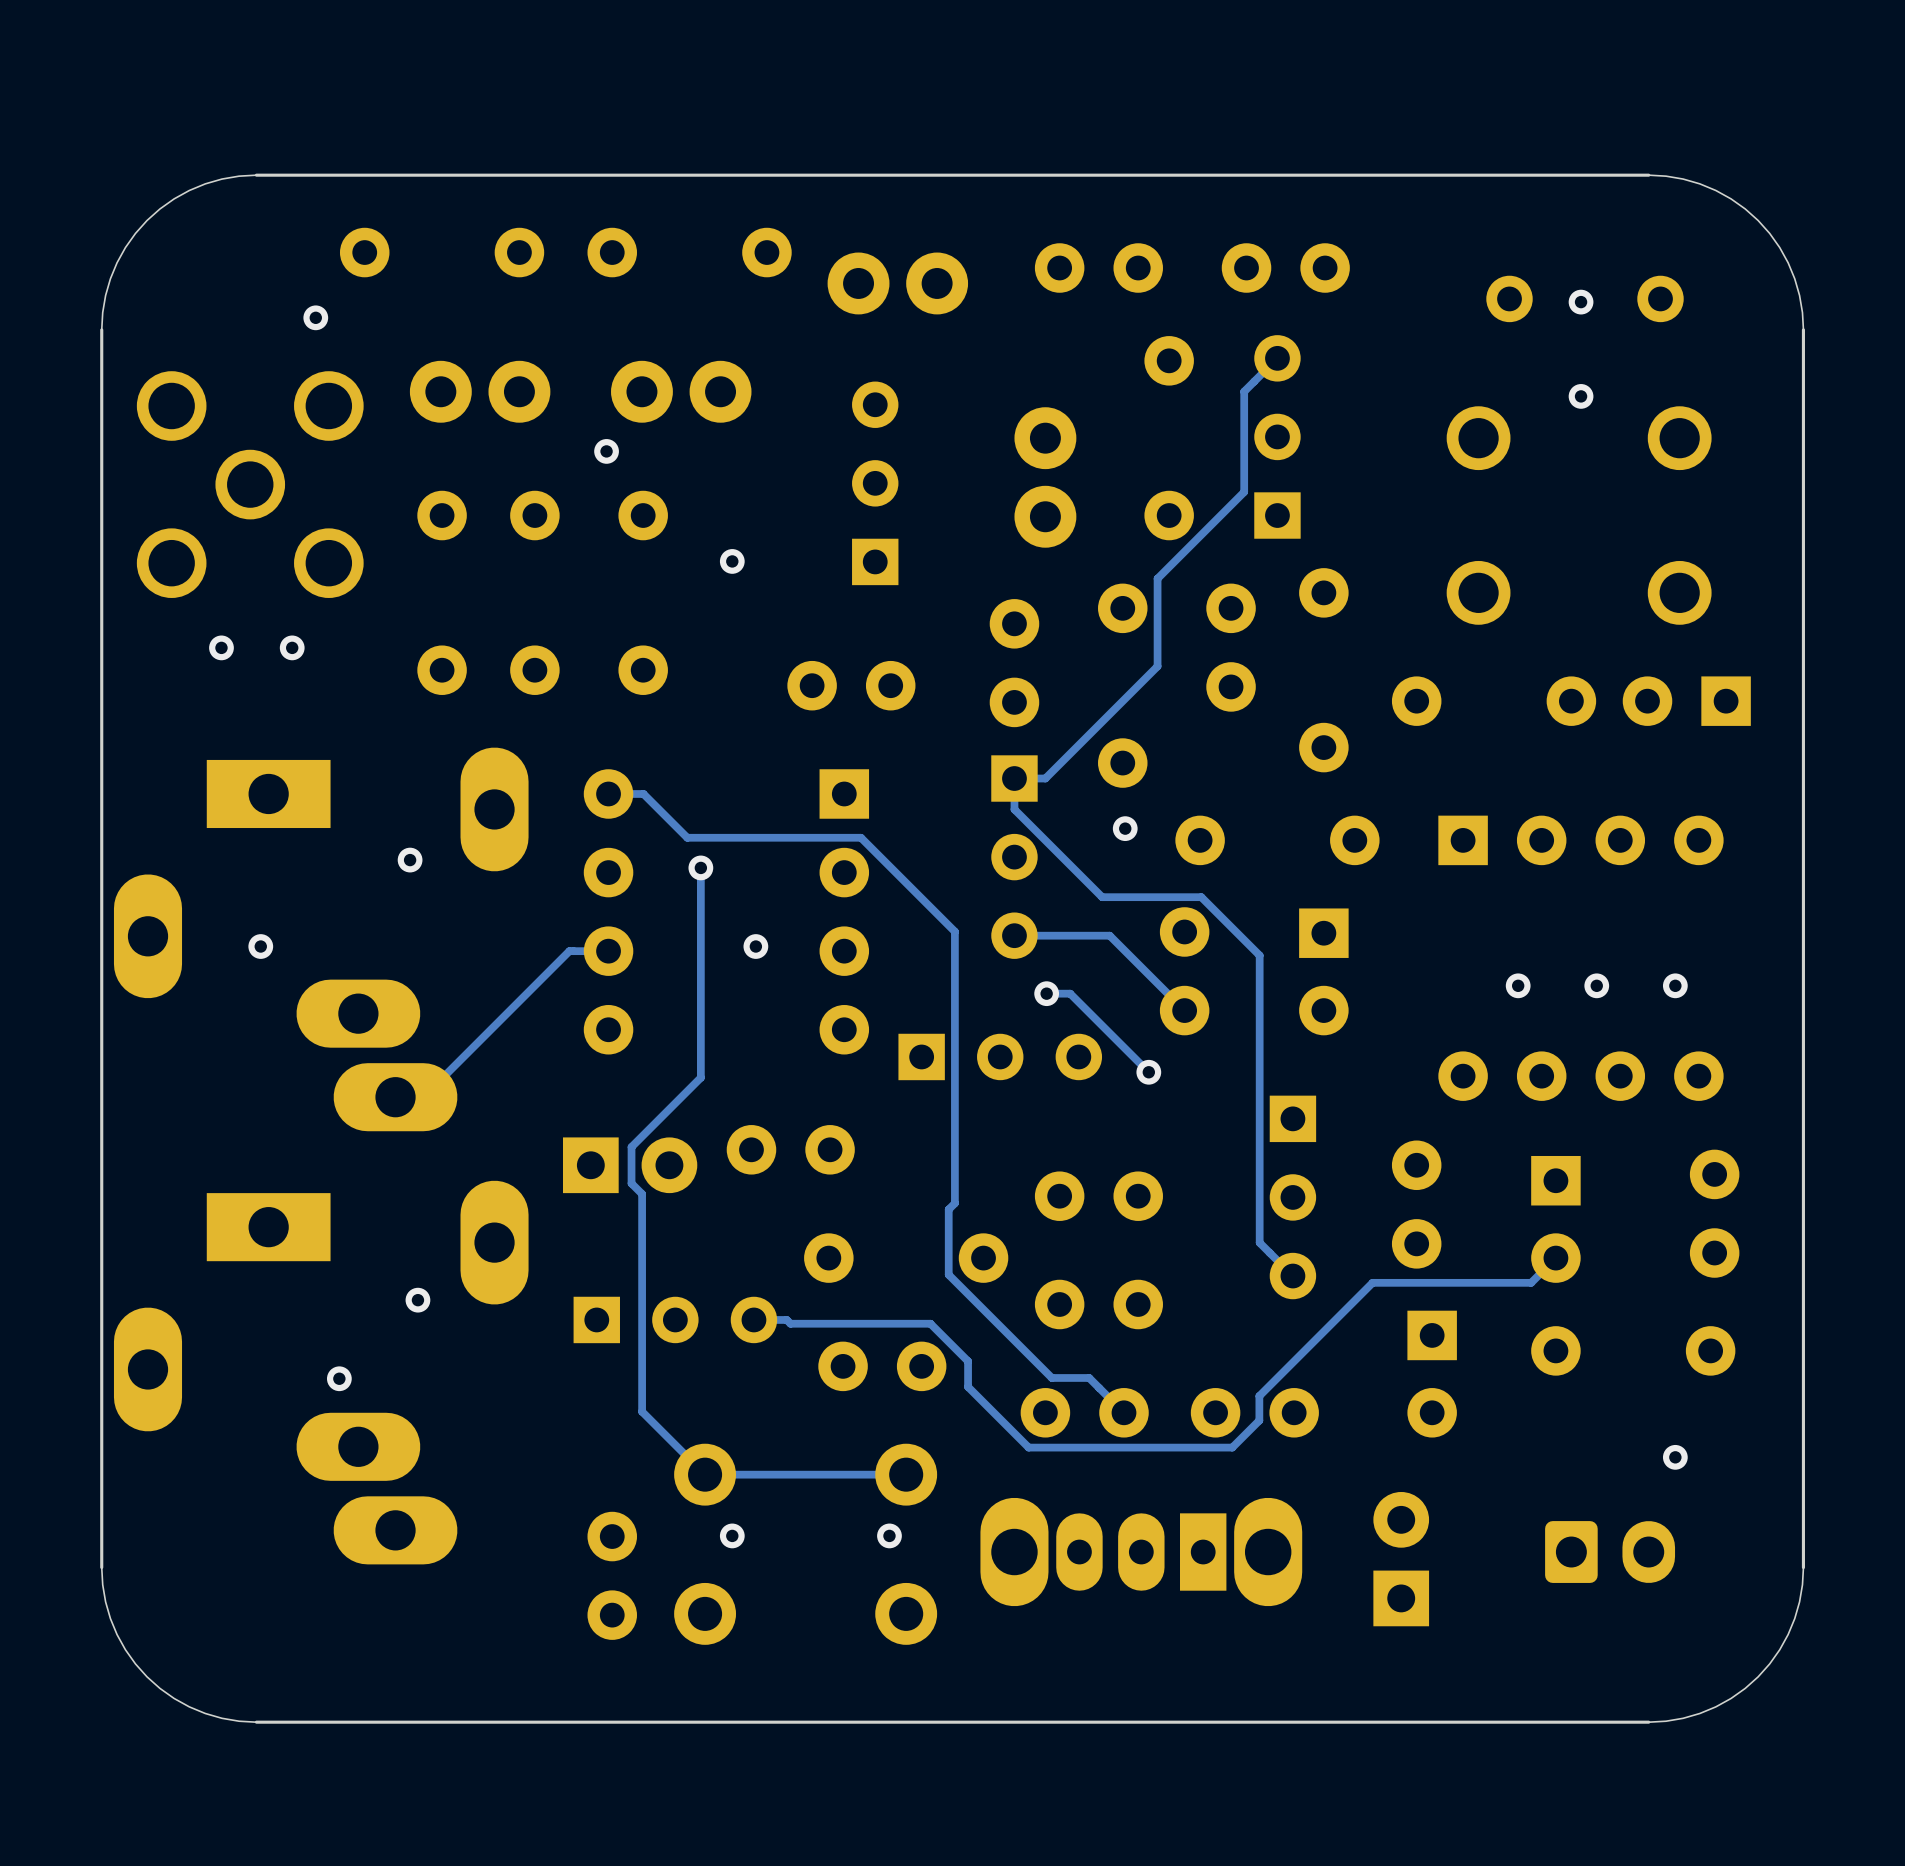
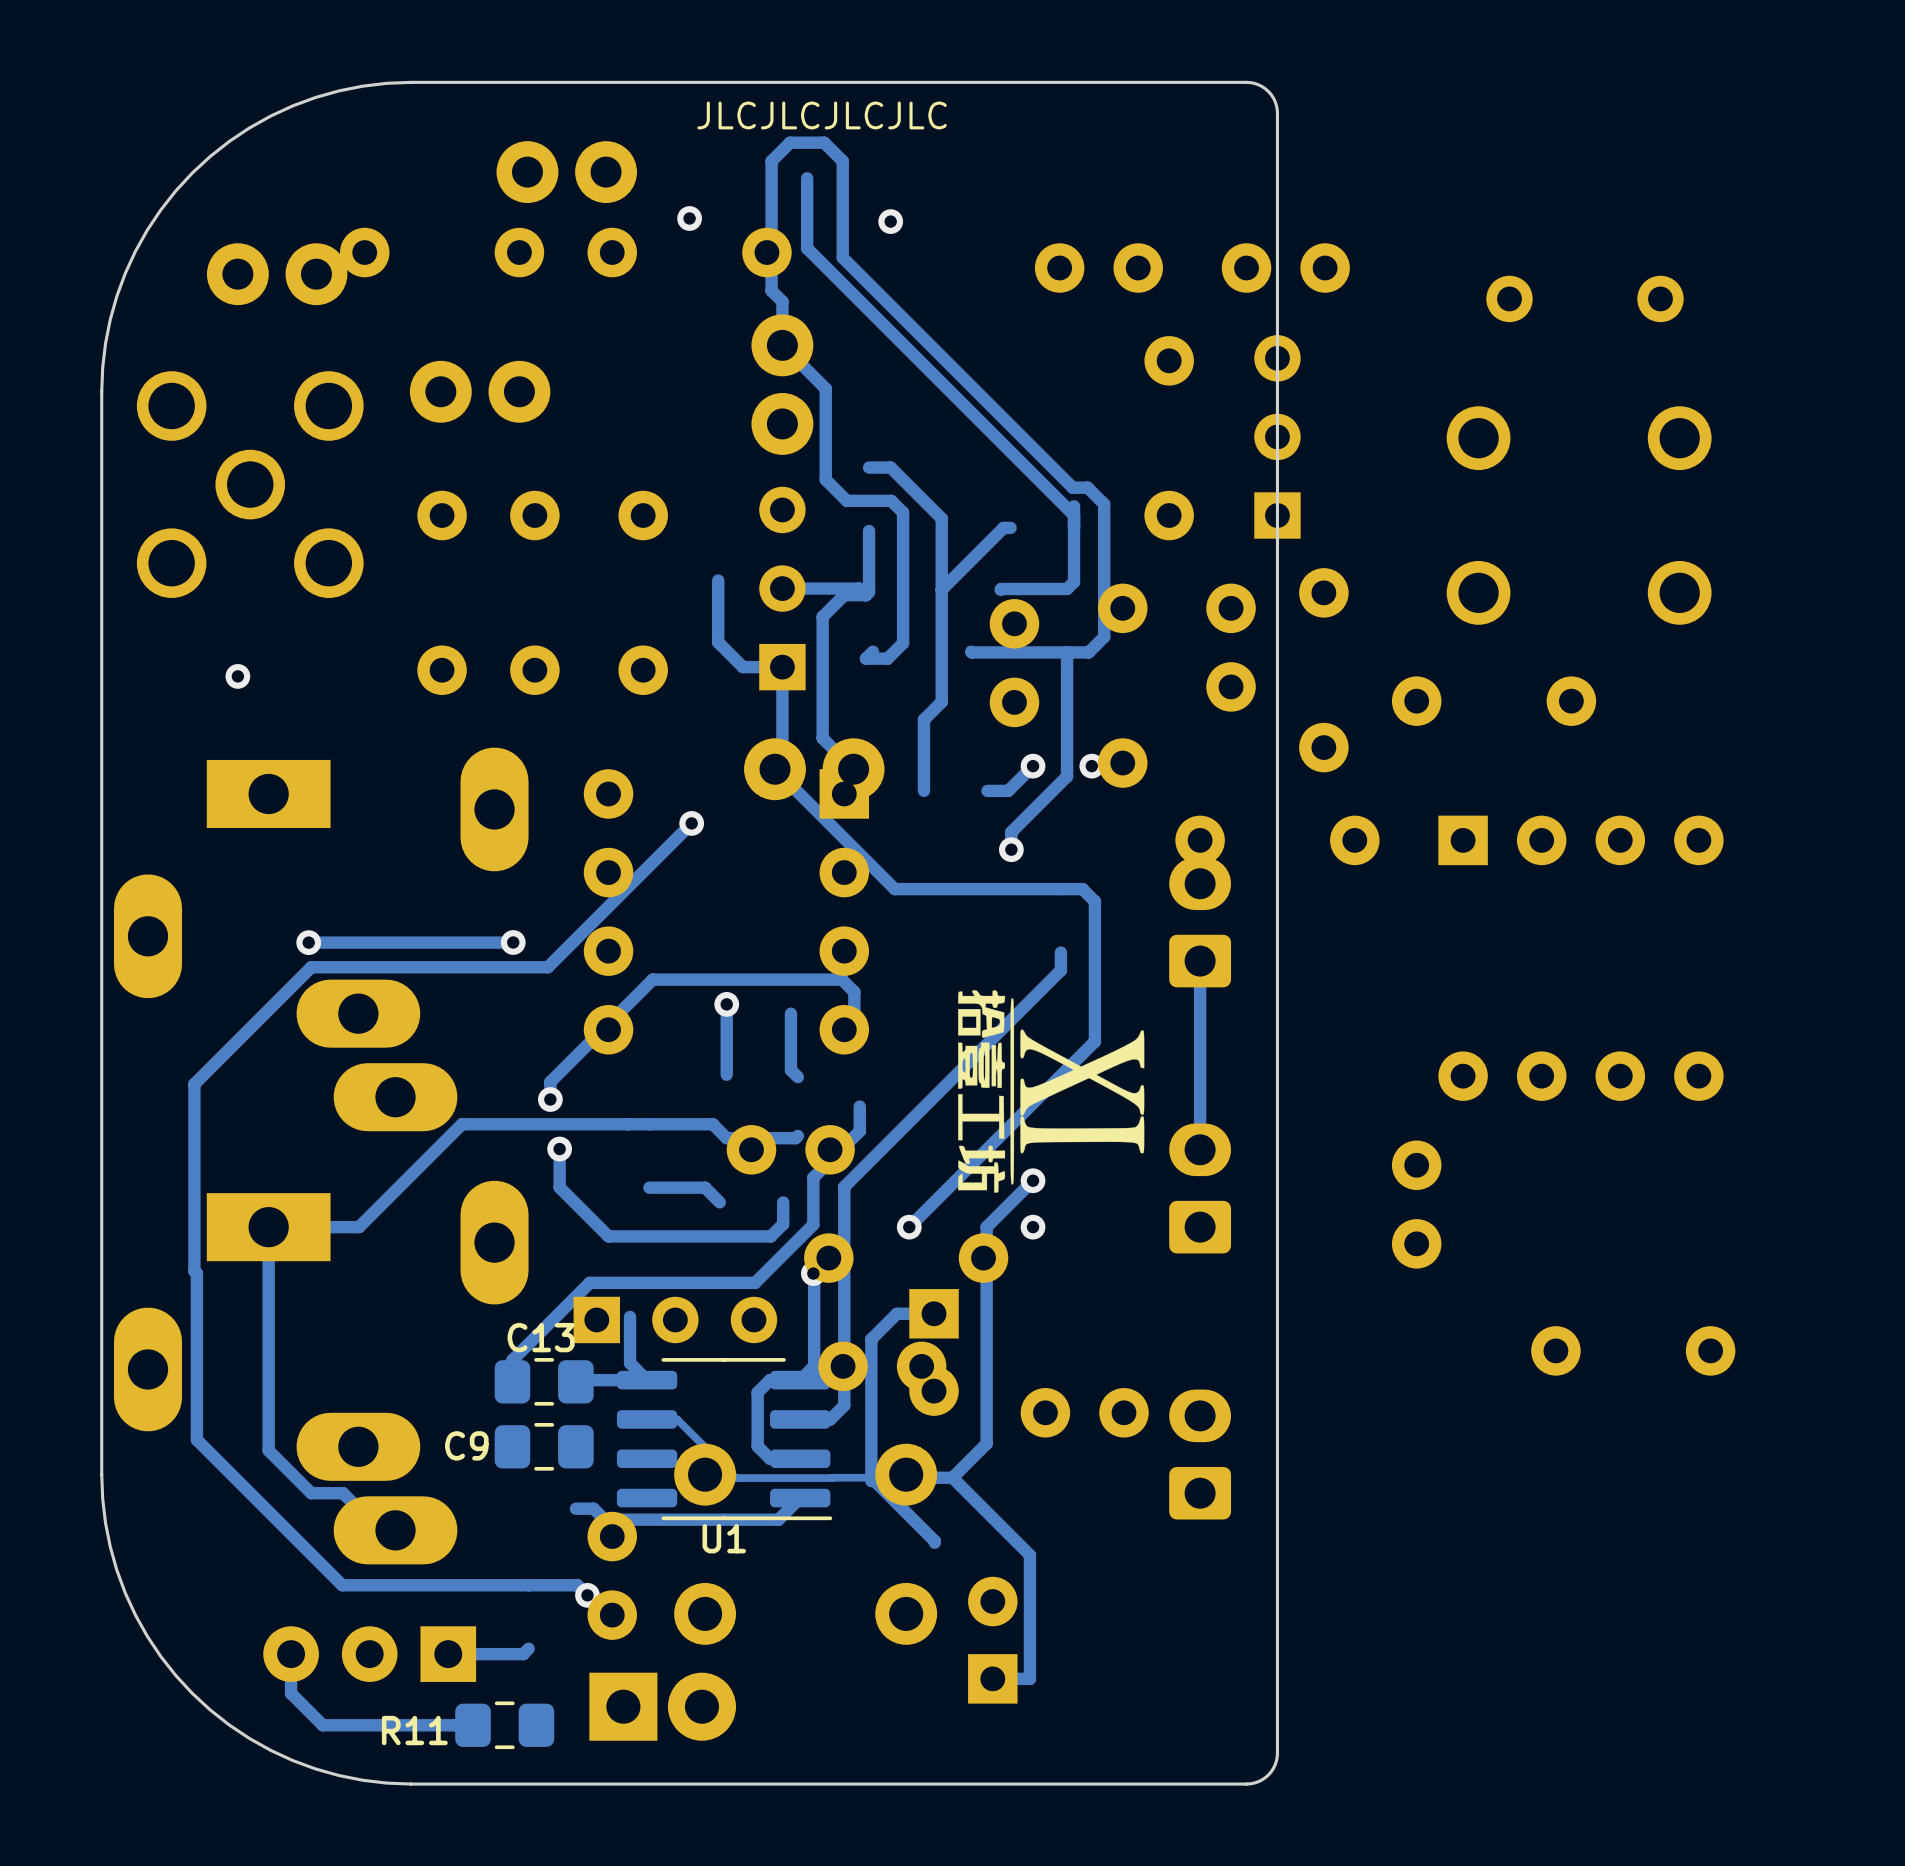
text: none -> JLCJLCJLCJLC (822, 115)
part: none -> (566, 172)
track: none -> (807, 178) (807, 248) (1074, 515)
via: none -> (689, 218)
via: none -> (890, 221)
part: none -> (277, 274)
part: (897, 283) -> none
via: (1581, 302) -> none
via: (315, 317) -> none
track: (1277, 358) (1244, 391) (1244, 492) (1157, 578) (1157, 666) (1045, 778) (1014, 778) (1014, 809) (1102, 897) (1201, 897) (1259, 955) (1259, 1242) (1292, 1276) -> none
part: none -> (782, 384)
board edge: (101, 391) (102, 312) (110, 278) (125, 247) (147, 220) (174, 198) (205, 183) (239, 176) (1648, 175) (1683, 179) (1715, 190) (1731, 198) (1758, 220) (1779, 247) (1794, 278) (1799, 295) (1803, 329) (1802, 1584) (1794, 1618) (1788, 1634) (1779, 1649) (1758, 1676) (1731, 1698) (1715, 1706) (1699, 1713) (1666, 1721) (239, 1721) (205, 1713) (174, 1698) (147, 1676) (125, 1649) (110, 1618) (102, 1584) (101, 1474) -> (101, 391) (105, 343) (116, 296) (135, 251) (160, 209) (192, 172) (229, 141) (270, 116) (292, 105) (338, 90) (362, 86) (411, 82) (1246, 82) (1254, 83) (1265, 88) (1271, 94) (1276, 105) (1277, 1753) (1275, 1764) (1271, 1771) (1258, 1781) (1246, 1784) (411, 1784) (386, 1783) (338, 1775) (292, 1760) (249, 1738) (210, 1709) (175, 1675) (147, 1636) (125, 1593) (116, 1570) (105, 1523) (101, 1474)
part: (681, 391) -> none
via: (1581, 396) -> none
via: (606, 451) -> none
track: none -> (869, 467) (890, 467) (941, 518) (941, 701) (923, 719) (923, 790)
part: (1045, 477) -> none
part position: (875, 483) -> (782, 588)
track: none -> (1074, 506) (1074, 582) (1067, 589) (1000, 589)
track: none -> (1010, 527) (1003, 527) (941, 589)
track: none -> (869, 530) (869, 592) (865, 595)
via: (732, 561) -> none
track: none -> (718, 580) (718, 642) (742, 667) (782, 667) (782, 761) (774, 769) (894, 889) (1082, 889) (1094, 901) (1094, 1041) (909, 1227)
track: none -> (782, 588) (859, 588) (865, 595)
track: none -> (865, 595) (844, 595) (822, 616) (822, 738) (853, 769)
via: (221, 647) -> none
via: (292, 647) -> none
track: none -> (971, 651) (1088, 652) (1104, 636) (1104, 504) (1087, 487) (1072, 487) (842, 257) (842, 161) (824, 142) (790, 142) (771, 161) (771, 290) (782, 301) (782, 345) (825, 388) (825, 479) (846, 500) (891, 500) (903, 512) (903, 643) (887, 658) (865, 658) (872, 651)
track: none -> (1067, 652) (1067, 776) (1011, 832) (1011, 849)
via: none -> (237, 676)
part: (851, 685) -> none
part: (1686, 701) -> none
track: none -> (1033, 766) (1008, 790) (987, 790)
via: none -> (1033, 766)
via: none -> (1091, 766)
part: none -> (814, 769)
track: (608, 793) (643, 793) (687, 837) (861, 837) (954, 931) (954, 1203) (948, 1209) (948, 1274) (1051, 1377) (1089, 1377) (1124, 1412) -> none
track: none -> (691, 823) (547, 967) (311, 967) (194, 1084) (196, 1439) (342, 1585) (577, 1585) (587, 1595)
via: (1125, 828) -> none
via: none -> (1011, 849)
part: (1014, 857) -> none
via: (410, 860) -> none
track: (700, 867) (700, 1077) (631, 1147) (631, 1183) (642, 1194) (642, 1411) (705, 1474) (906, 1474) -> none
via position: (700, 867) -> (691, 823)
part: none -> (1200, 922)
track: (1014, 935) (1109, 935) (1184, 1010) -> none
track: none -> (513, 942) (308, 942)
via: none -> (513, 942)
via position: (260, 946) -> (308, 942)
via position: (755, 946) -> (726, 1004)
track: (608, 951) (569, 951) (423, 1097) (395, 1097) -> none
track: none -> (1060, 952) (1060, 970) (844, 1186) (844, 1405) (830, 1419) (800, 1419)
track: none -> (1200, 961) (1200, 1149)
part: (1184, 971) -> none
part: (1323, 971) -> none
via: (1518, 985) -> none
via: (1596, 985) -> none
via: (1675, 985) -> none
drawing: none -> [958, 990, 1145, 1193]
track: (1046, 993) (1070, 993) (1148, 1072) -> none
via: (1046, 993) -> none
track: none -> (726, 1004) (726, 1074)
track: none -> (790, 1013) (790, 1070) (797, 1077)
track: none -> (854, 1013) (854, 992) (841, 979) (652, 979) (550, 1082) (550, 1099)
part: (1000, 1056) -> none
via: (1148, 1072) -> none
via: none -> (550, 1099)
track: none -> (859, 1106) (859, 1131) (813, 1177) (813, 1224) (755, 1282) (589, 1282) (512, 1360) (512, 1381)
track: none -> (797, 1135) (795, 1138) (726, 1138) (712, 1124) (461, 1124) (359, 1227) (268, 1227) (268, 1450) (311, 1493) (343, 1493) (380, 1530) (395, 1530)
track: none -> (559, 1149) (559, 1187) (608, 1236) (770, 1236) (783, 1224) (783, 1202)
via: none -> (559, 1149)
part: (630, 1165) -> none
track: none -> (1033, 1180) (986, 1227) (986, 1443) (952, 1477)
via: none -> (1033, 1180)
track: none -> (649, 1187) (705, 1187) (719, 1202)
part: none -> (1200, 1188)
part: (1098, 1196) -> none
part: (1292, 1197) -> none
part: (1714, 1213) -> none
part: (1555, 1219) -> none
via: none -> (909, 1227)
via: none -> (1033, 1227)
track: (1555, 1258) (1531, 1282) (1372, 1282) (1259, 1396) (1259, 1420) (1232, 1447) (1028, 1447) (968, 1386) (968, 1361) (930, 1323) (790, 1323) (786, 1319) (753, 1319) -> none
track: none -> (813, 1273) (814, 1366) (800, 1380) (770, 1380) (757, 1392) (757, 1446) (770, 1458) (800, 1458)
via: none -> (813, 1273)
via: (417, 1300) -> none
part: (1098, 1304) -> none
track: none -> (934, 1313) (896, 1313) (871, 1339) (871, 1481)
track: none -> (630, 1316) (630, 1363) (647, 1380) (577, 1380) (575, 1381)
part: none -> (934, 1352)
part: (1432, 1374) -> none
via: (339, 1378) -> none
C13: none -> (544, 1381)
part: (1254, 1412) -> none
track: none -> (647, 1419) (677, 1419) (735, 1478) (831, 1478)
U1: none -> (724, 1439)
C9: none -> (544, 1446)
part: none -> (1200, 1454)
via: (1675, 1457) -> none
track: none -> (832, 1477) (871, 1477) (934, 1542)
track: none -> (952, 1477) (1029, 1555) (1029, 1678) (992, 1678)
track: none -> (952, 1477) (934, 1477)
track: none -> (800, 1498) (778, 1519) (604, 1519) (593, 1508) (575, 1508)
via: (732, 1535) -> none
via: (889, 1535) -> none
part: (1141, 1552) -> none
part: (1610, 1552) -> none
part: (1401, 1559) -> none
via: none -> (587, 1595)
part: none -> (992, 1640)
track: none -> (528, 1648) (523, 1654) (448, 1654)
track: none -> (291, 1654) (291, 1693) (322, 1725) (473, 1725)
part: none -> (369, 1654)
part: none -> (662, 1706)
R11: none -> (504, 1725)

